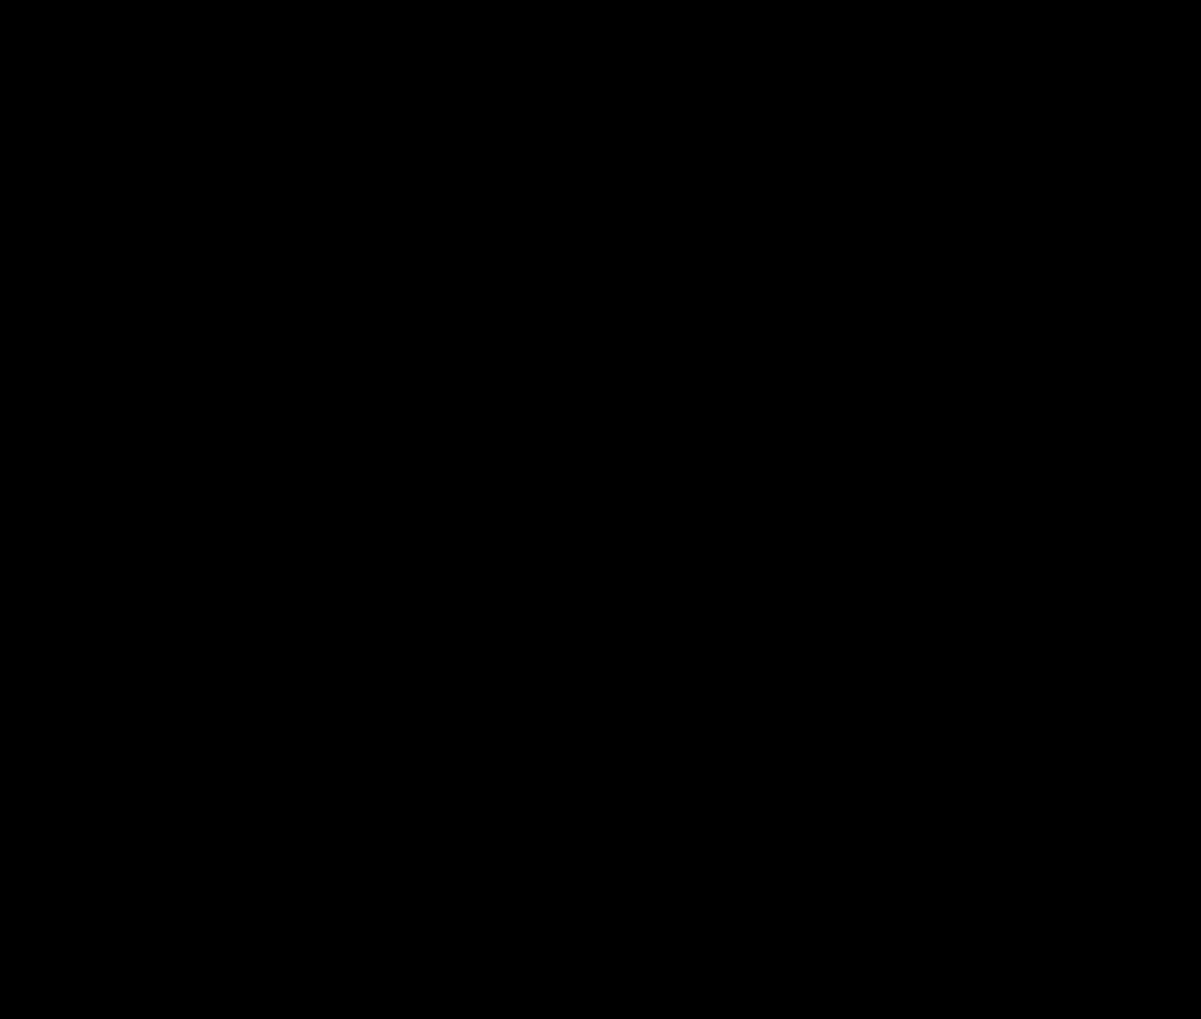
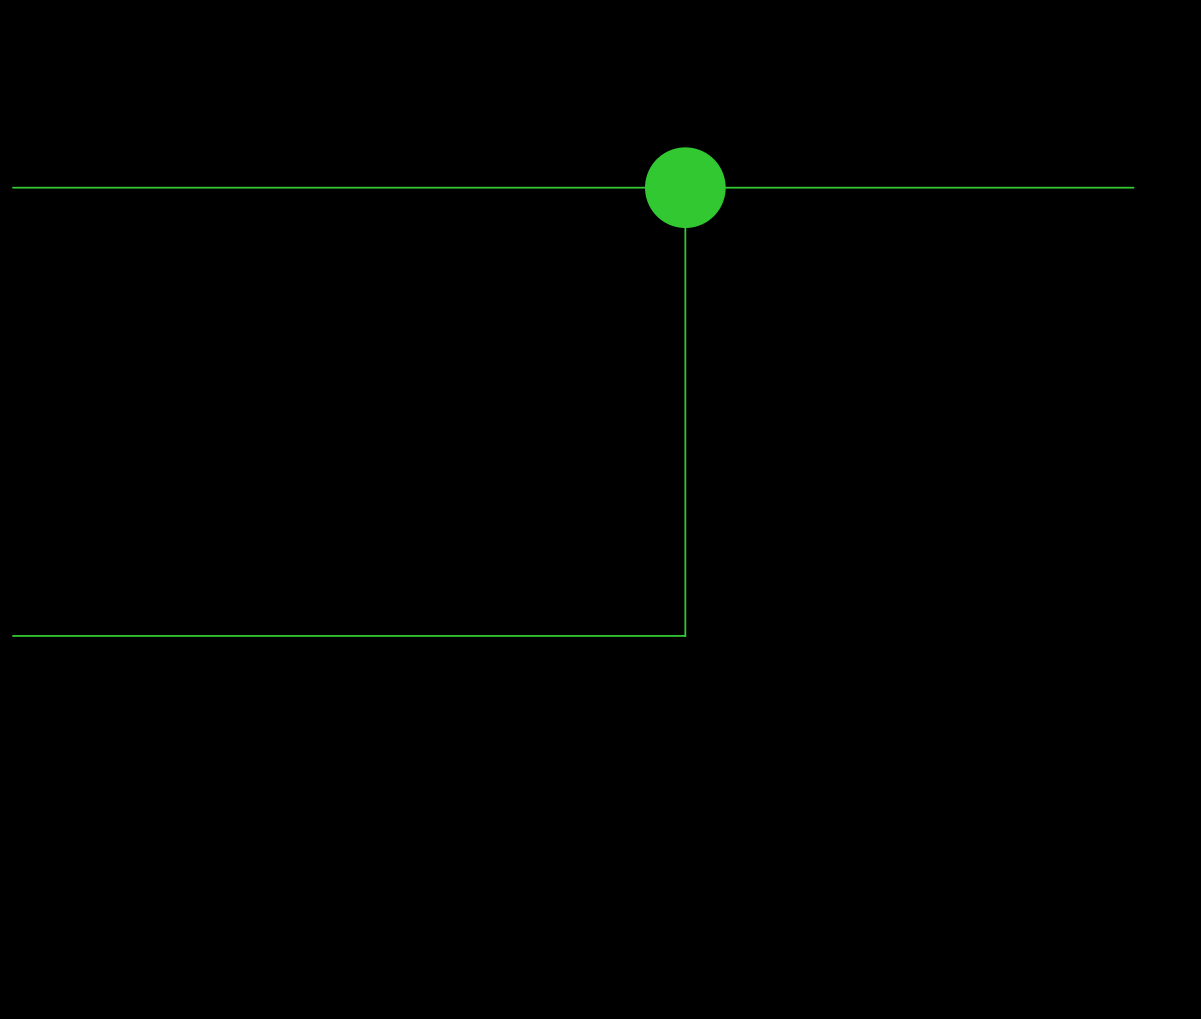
wire: none -> (12, 187) (1133, 187)
wire: none -> (685, 187) (685, 635) (12, 635)
junction: none -> (685, 187)

